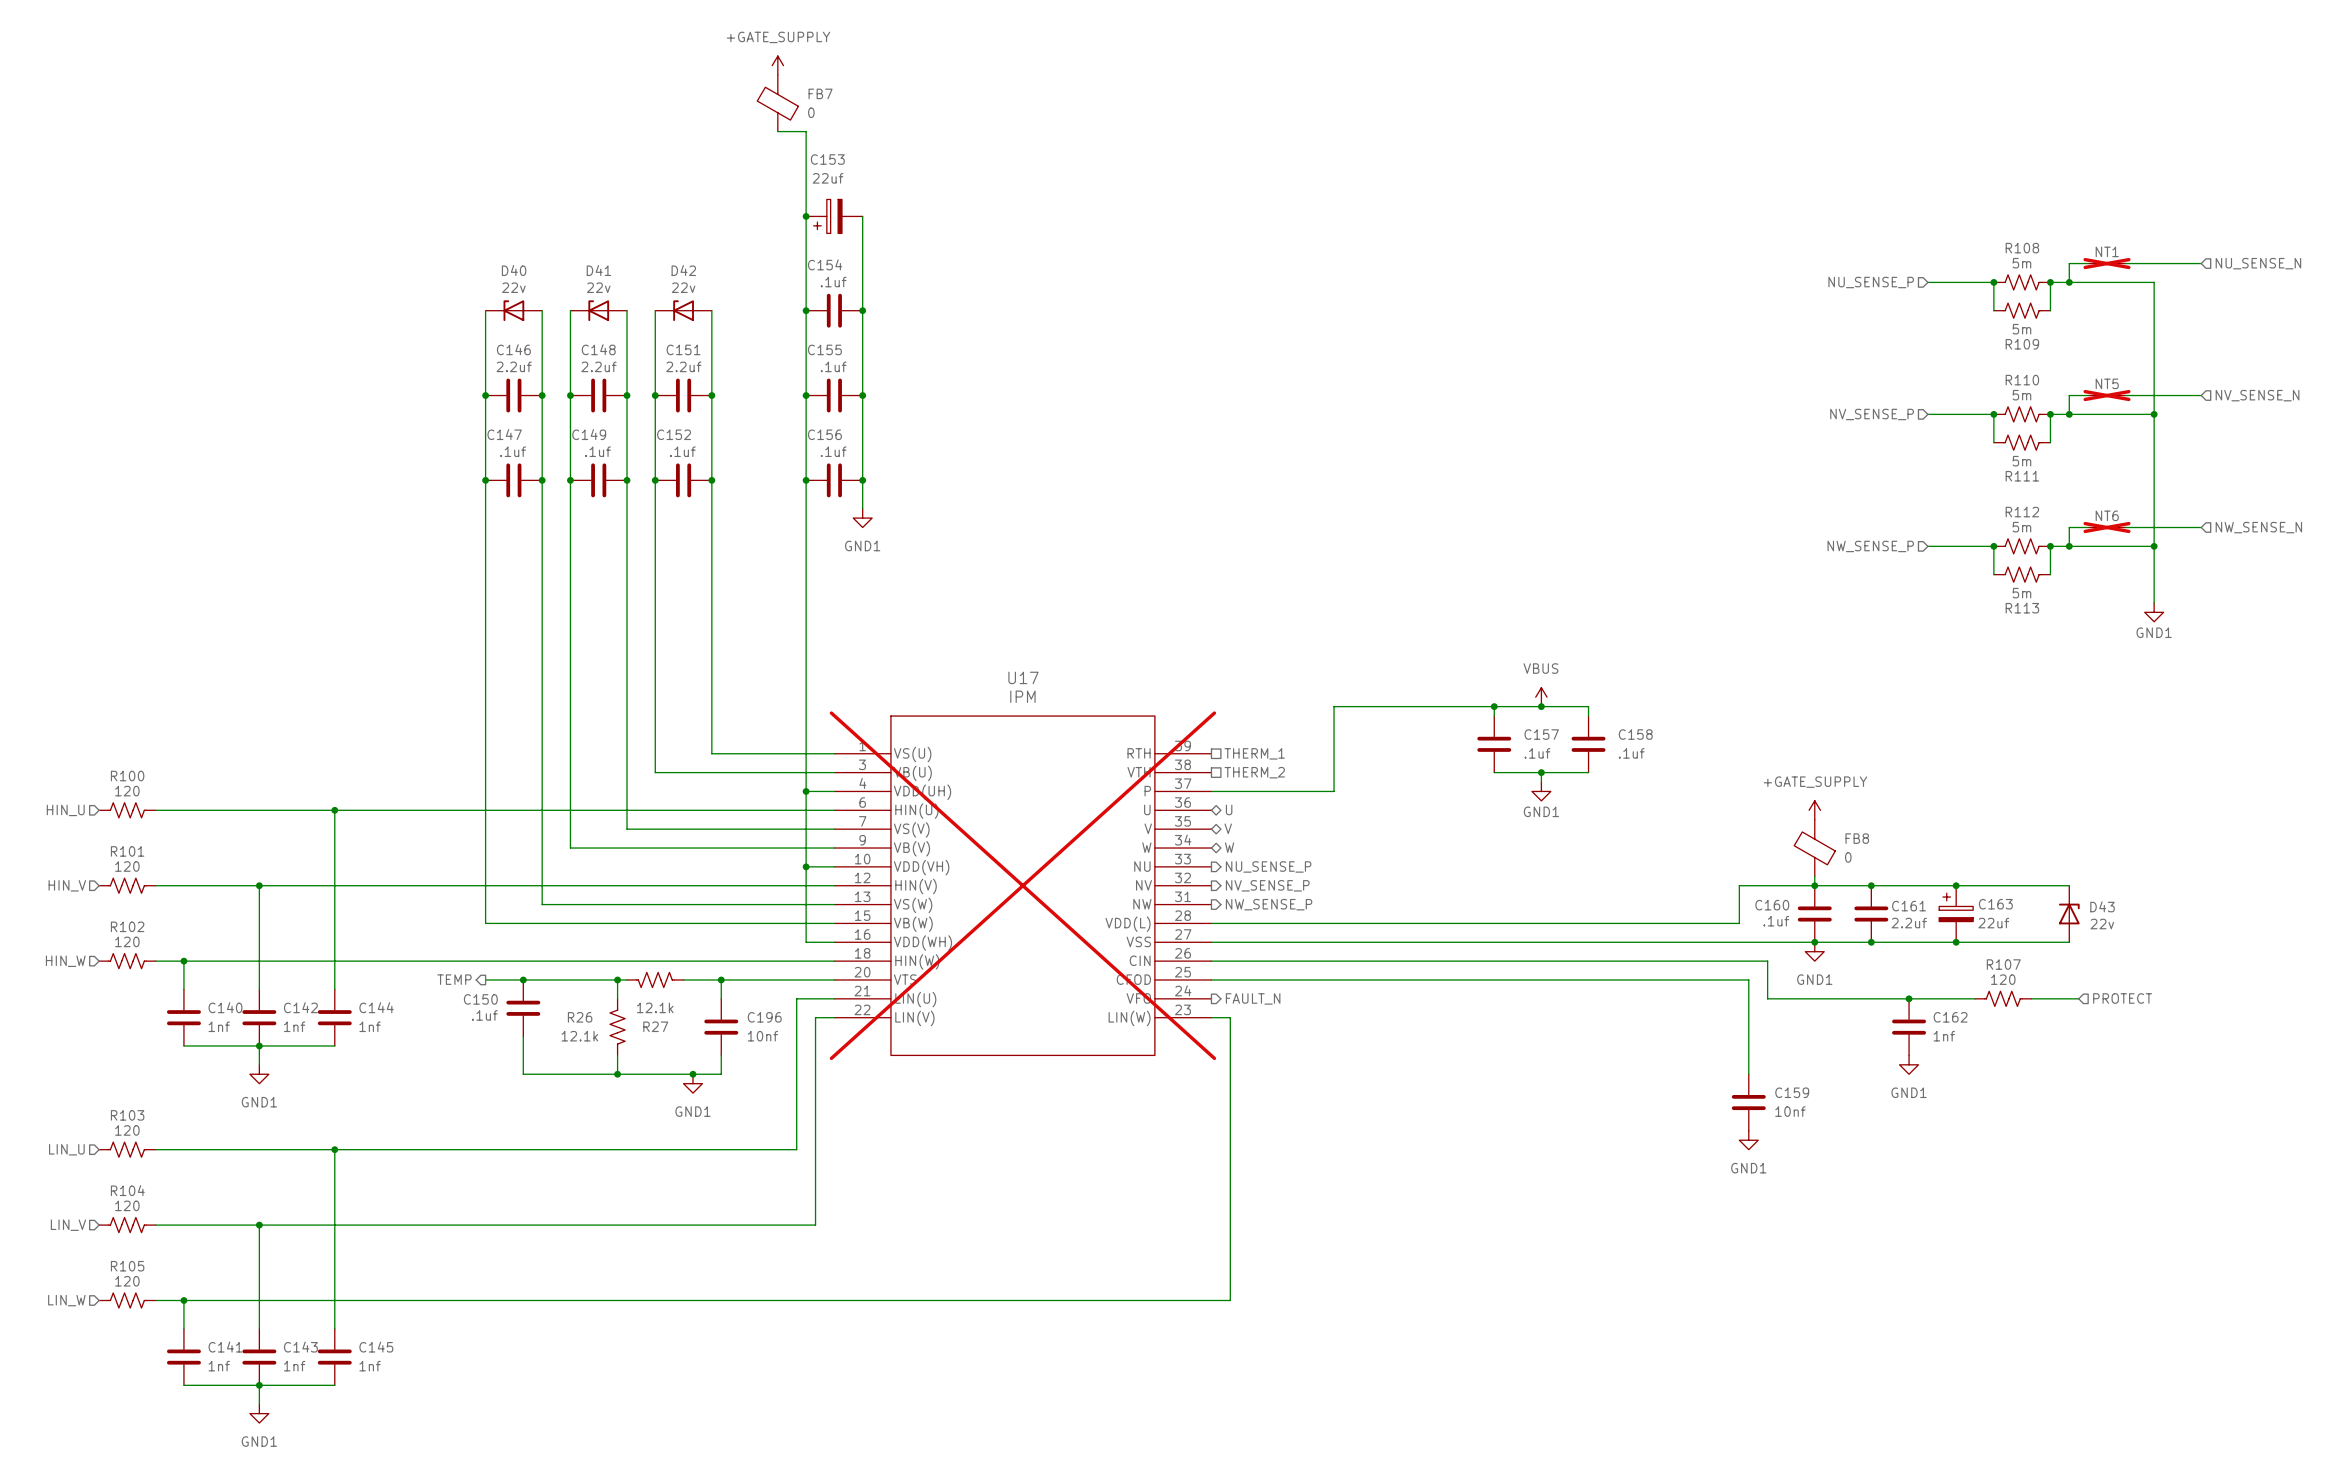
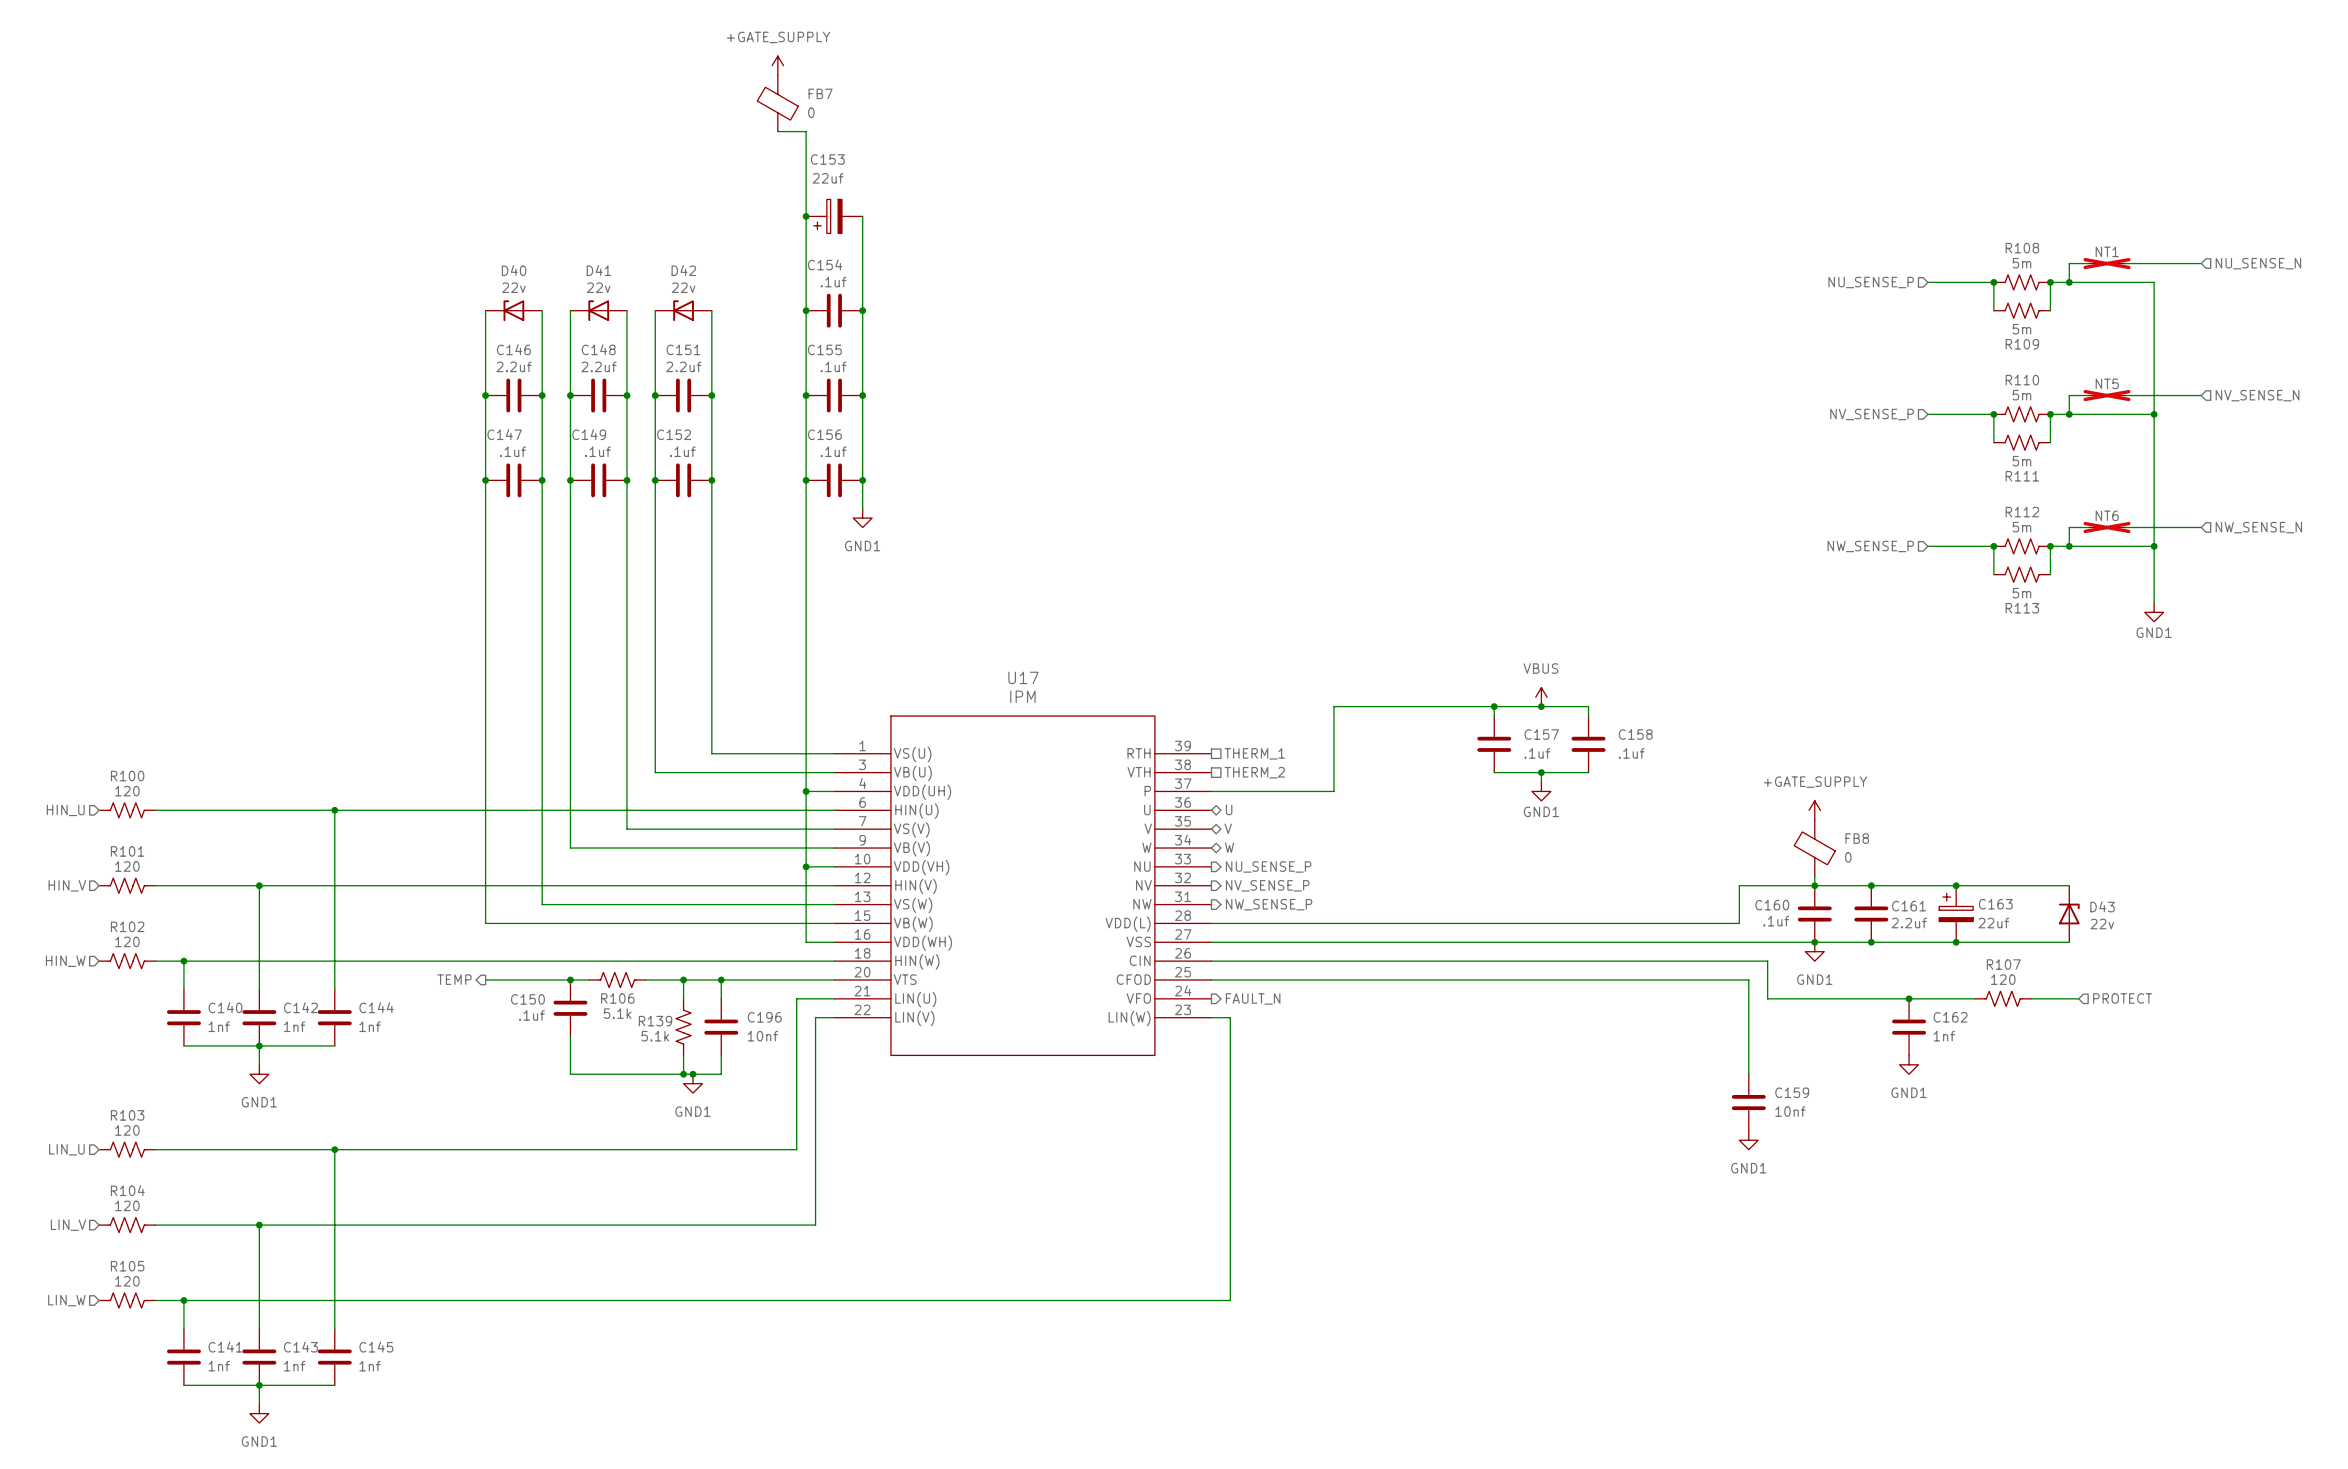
U17 do-not-place cross: (1022, 885) -> none
junction: (523, 979) -> none
junction: none -> (570, 979)
wire: (589, 979) (627, 979) -> none
wire: (617, 979) (617, 998) -> none
junction: (617, 979) -> none
R106: none -> 5.1k (617, 979)
wire: none -> (645, 979) (683, 979) (683, 998)
R27: 12.1k (655, 979) -> none
junction: none -> (683, 979)
C150 position: (523, 1008) -> (570, 1008)
R26: 12.1k (617, 1027) -> none
R139: none -> 5.1k (683, 1027)
wire: (523, 1036) (523, 1074) (570, 1074) -> (570, 1036) (570, 1074)
wire: (617, 1055) (617, 1074) -> (683, 1055) (683, 1074)
junction: (617, 1074) -> none
junction: none -> (683, 1074)

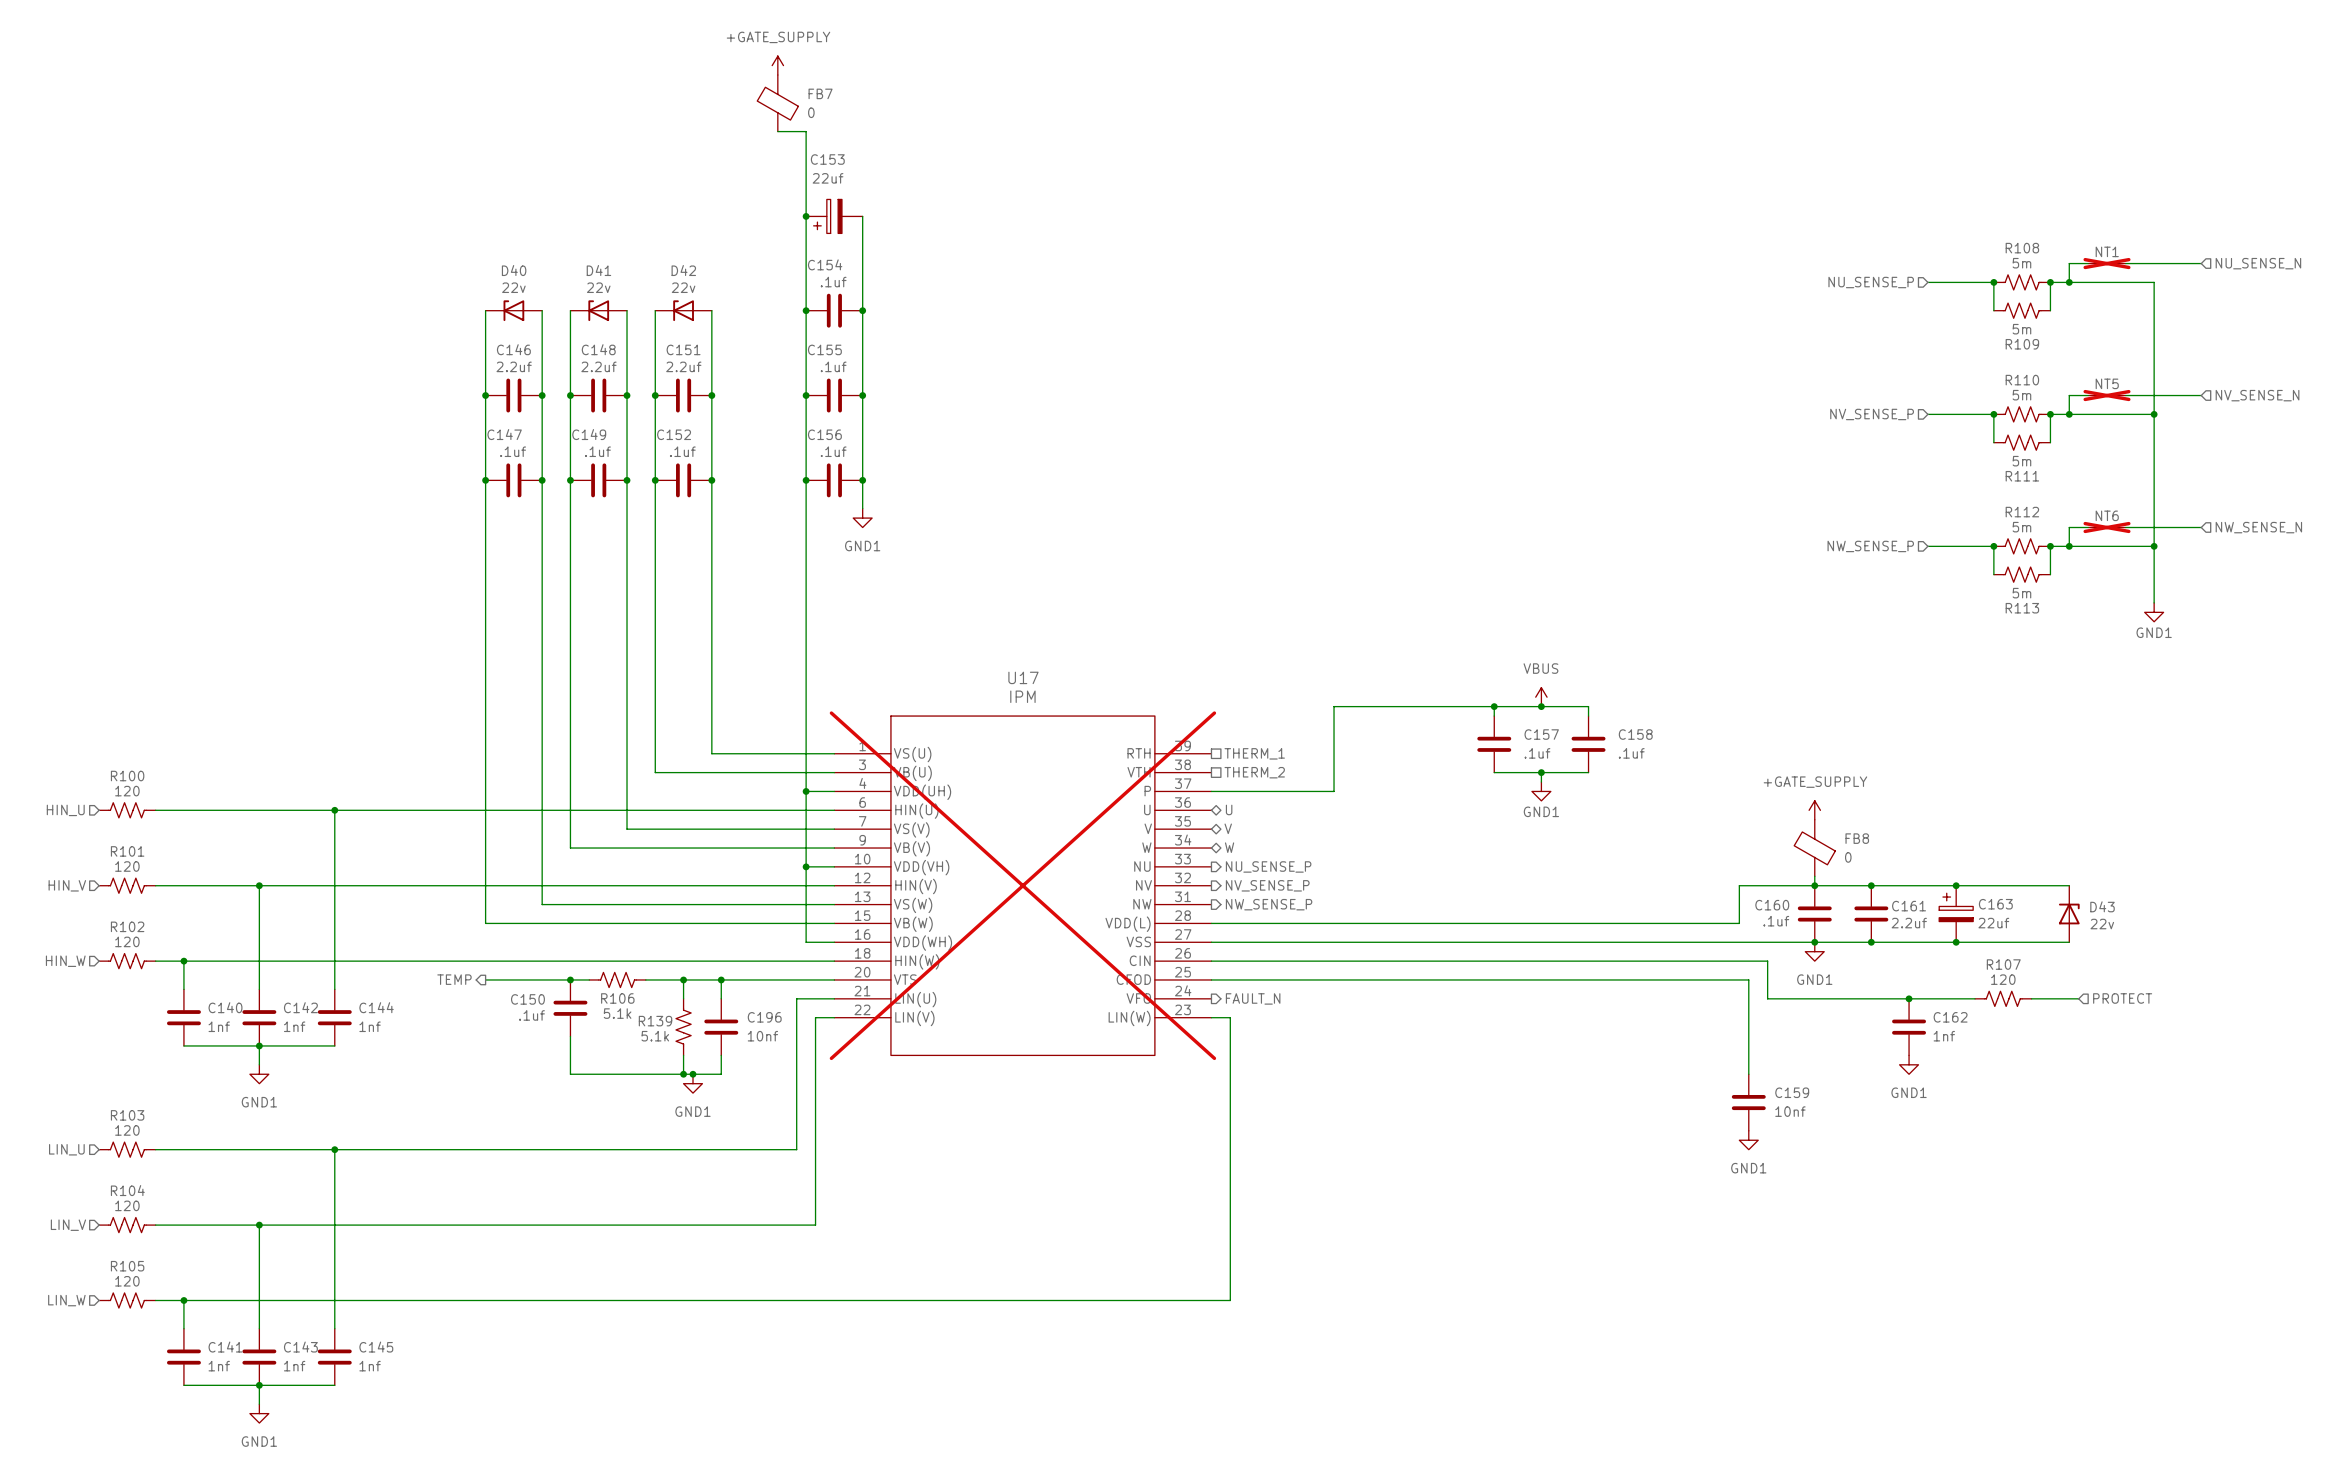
U17 do-not-place cross: none -> (1022, 885)

